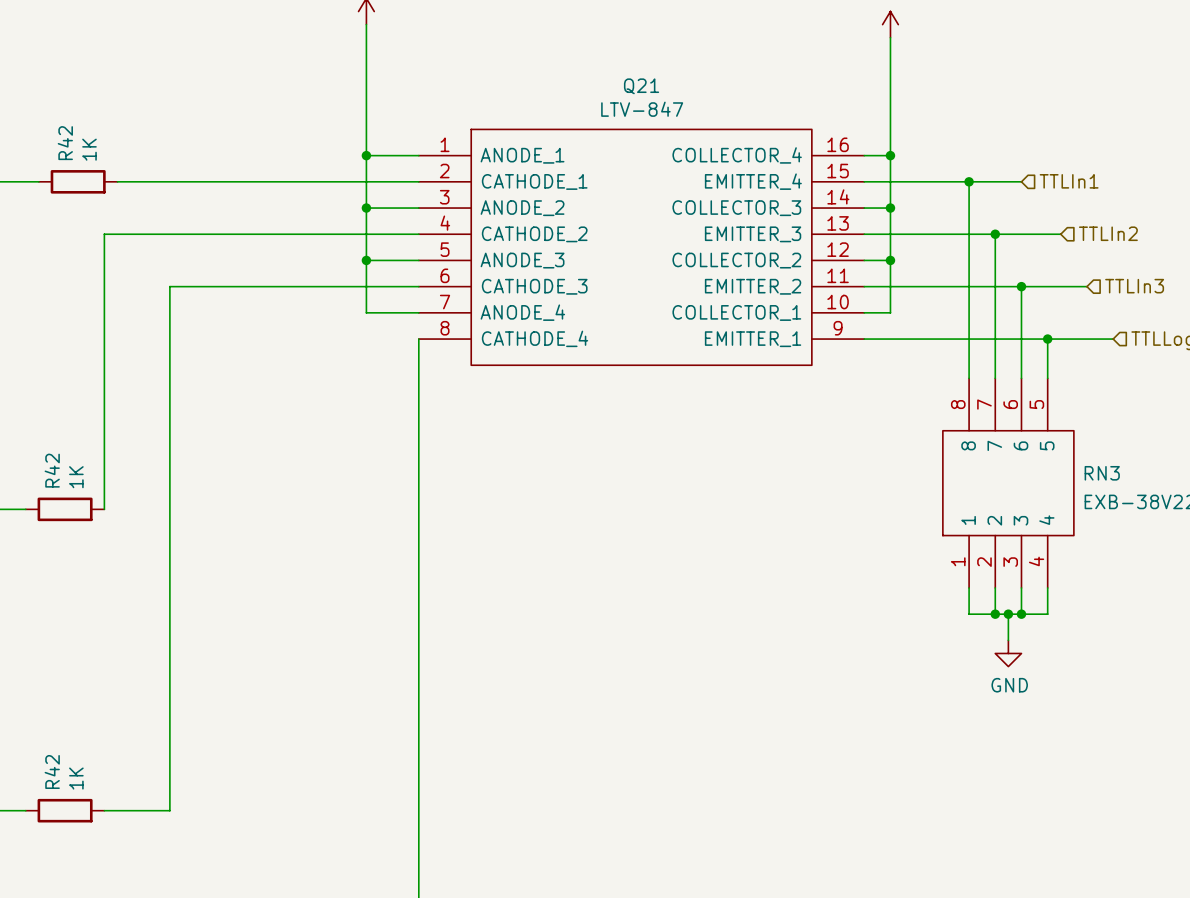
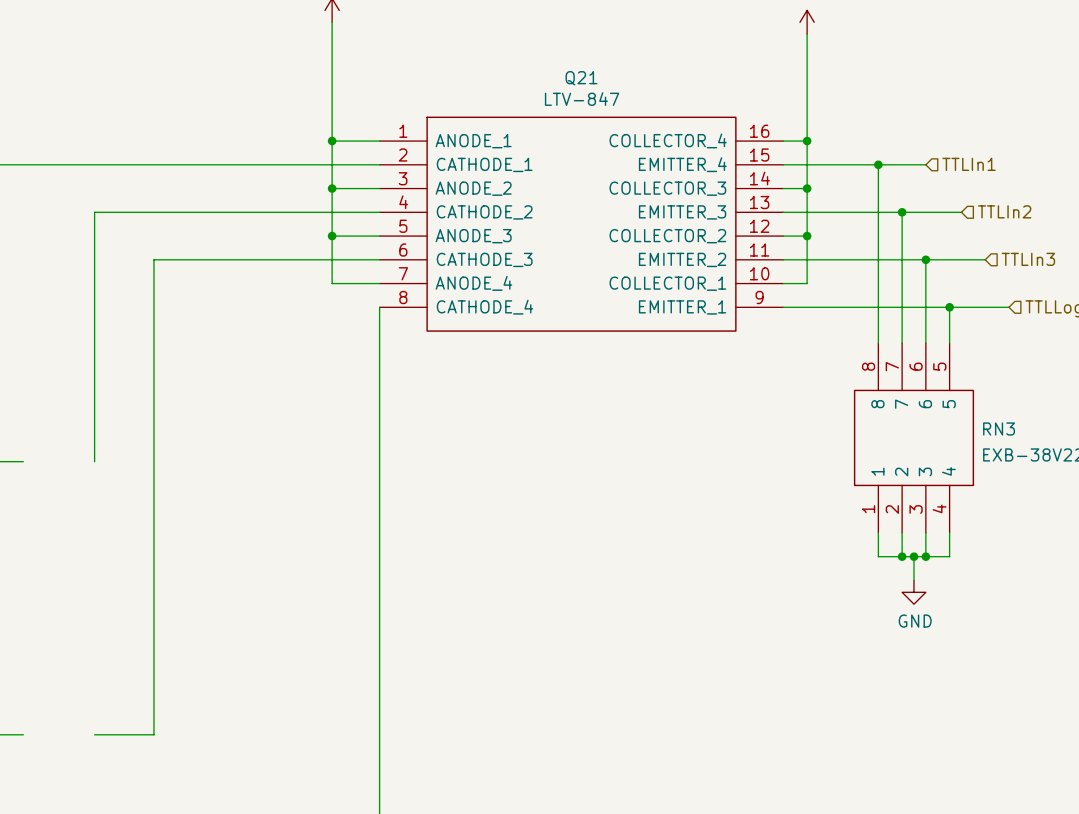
wire: none -> (35, 164) (106, 164)
R42: 1K (78, 181) -> none
R42: 1K (65, 509) -> none
R42: 1K (65, 810) -> none

